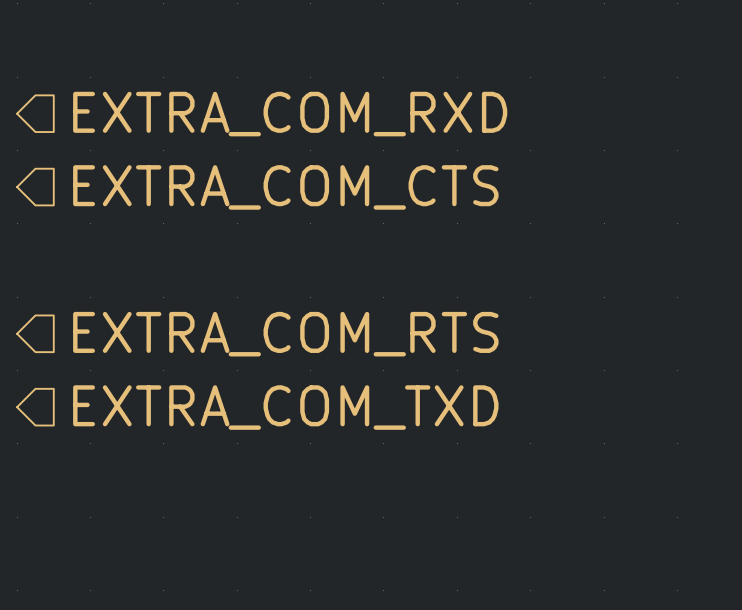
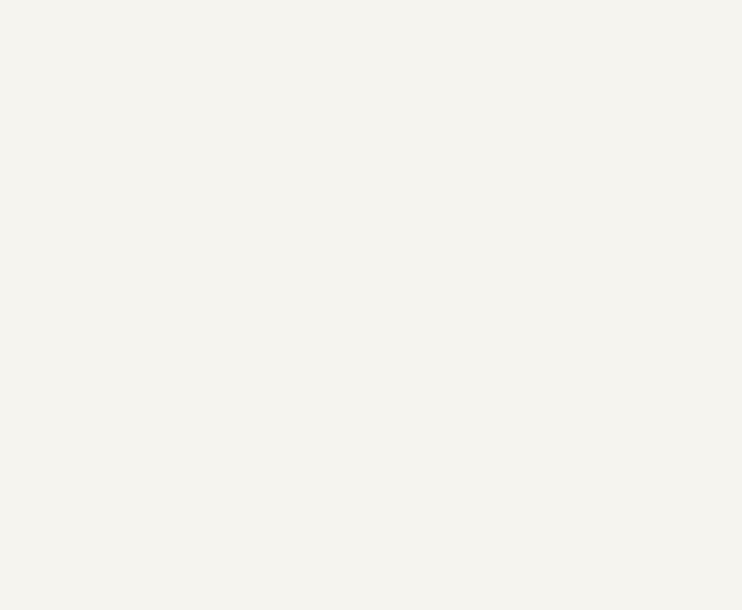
hierarchical label: EXTRA_COM_RXD (290, 114) -> none
hierarchical label: EXTRA_COM_CTS (285, 187) -> none
hierarchical label: EXTRA_COM_RTS (285, 334) -> none
hierarchical label: EXTRA_COM_TXD (285, 407) -> none

